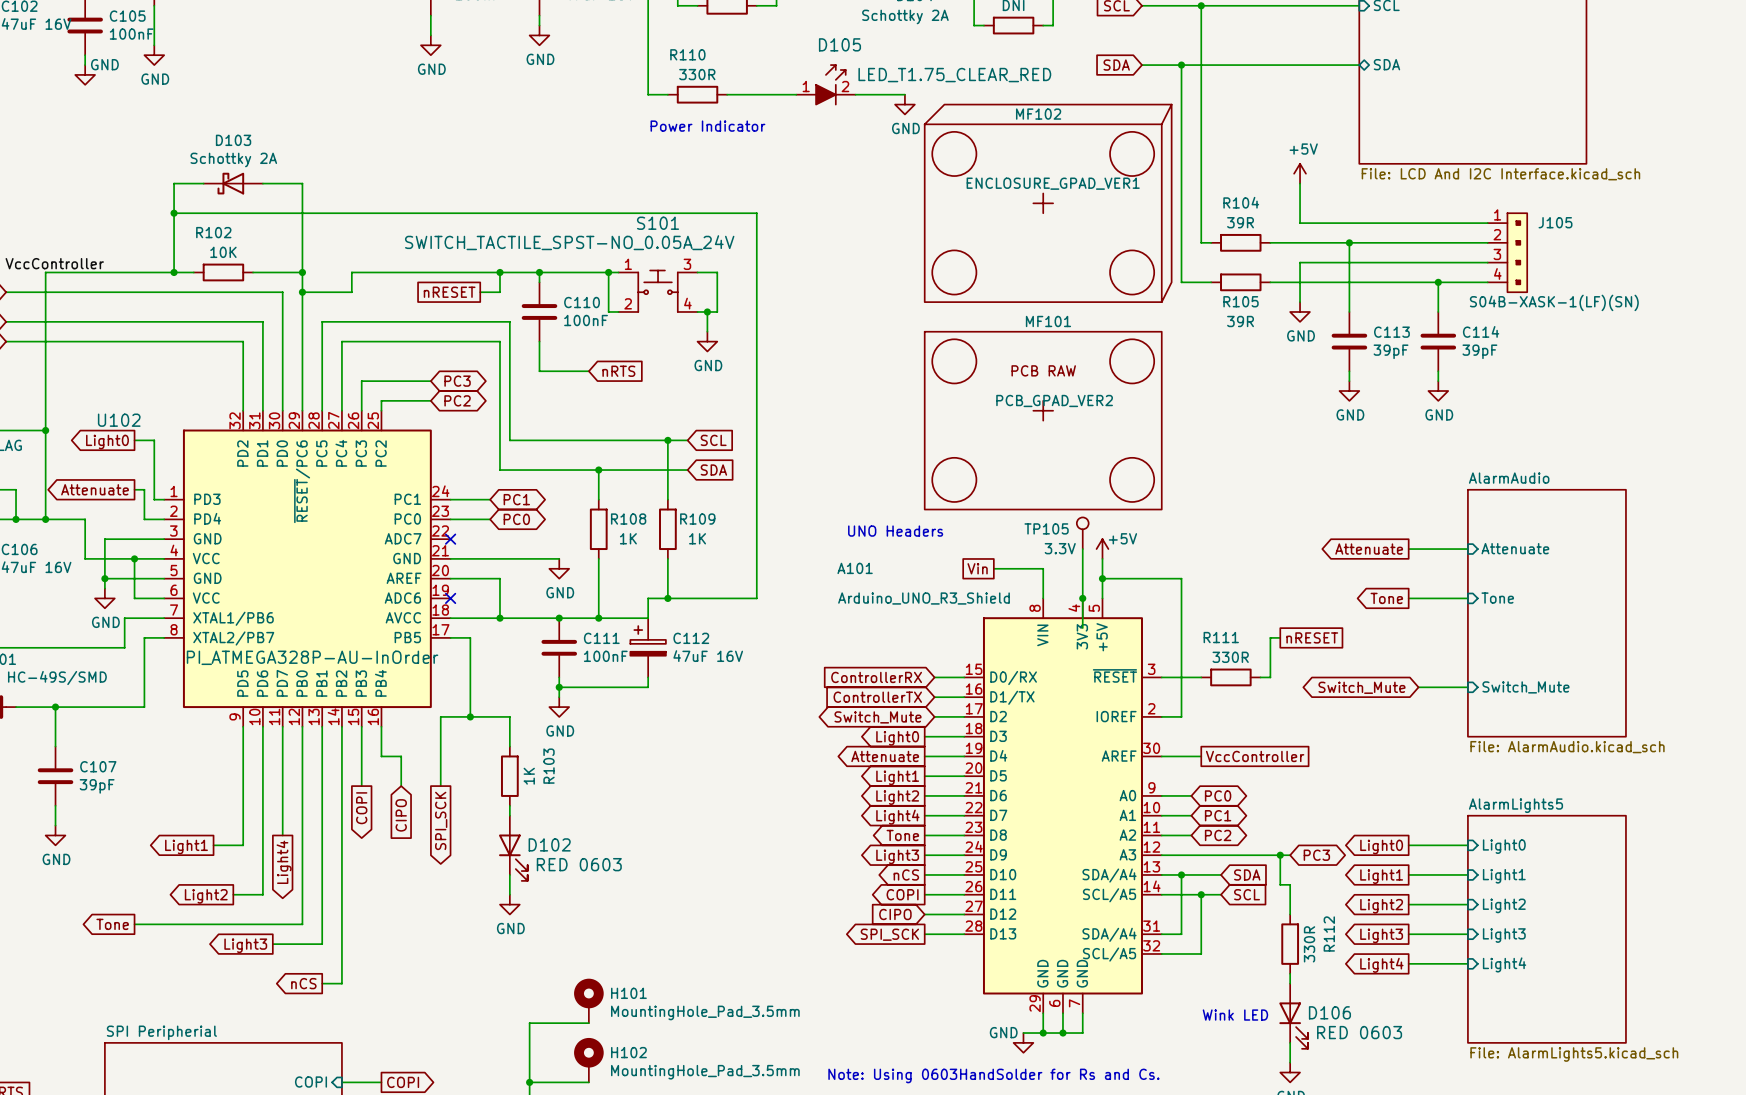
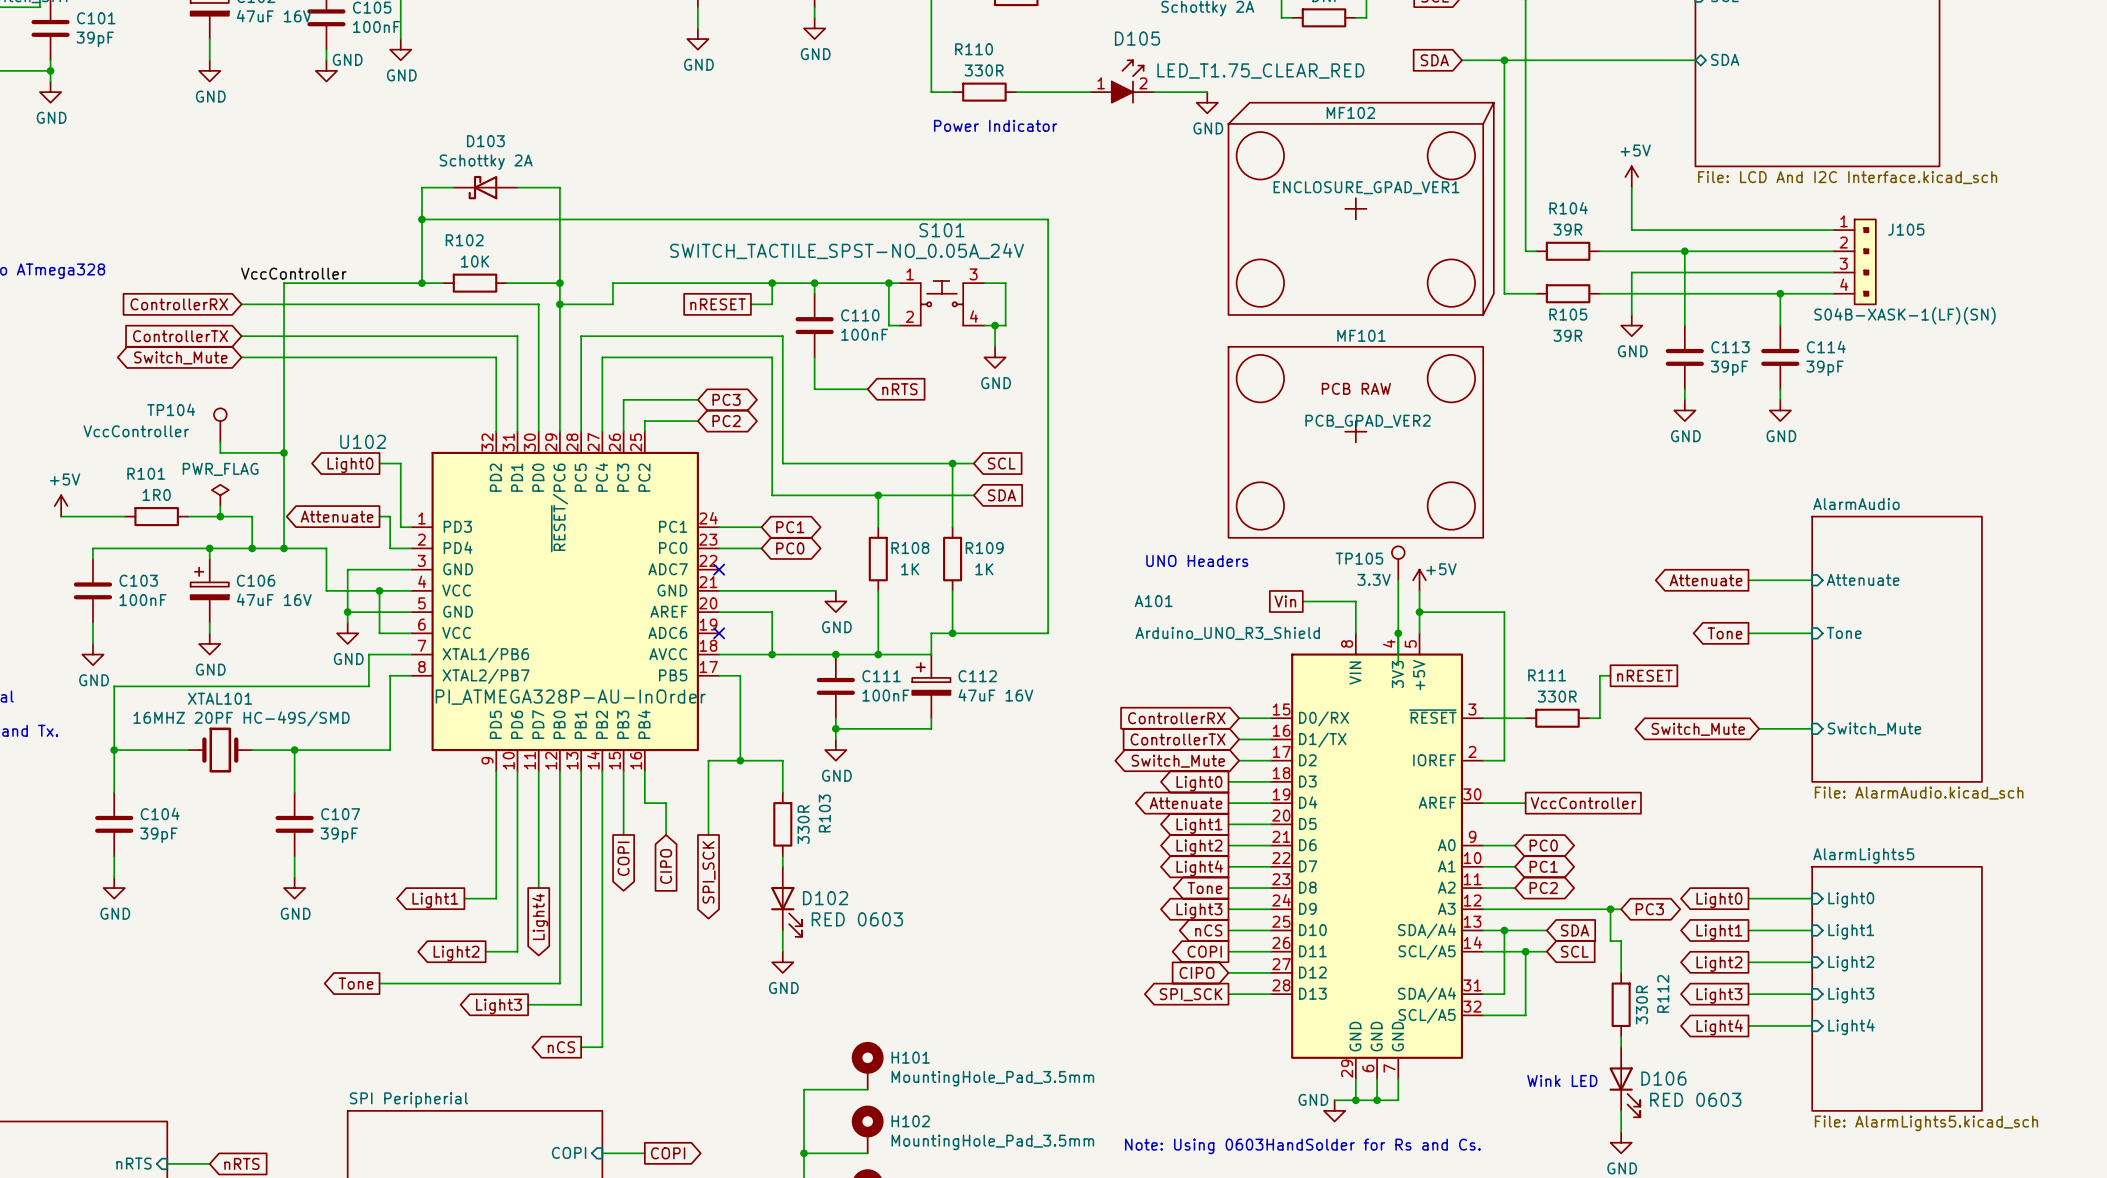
R103 value: 1K (529, 776) -> 330R (803, 824)

